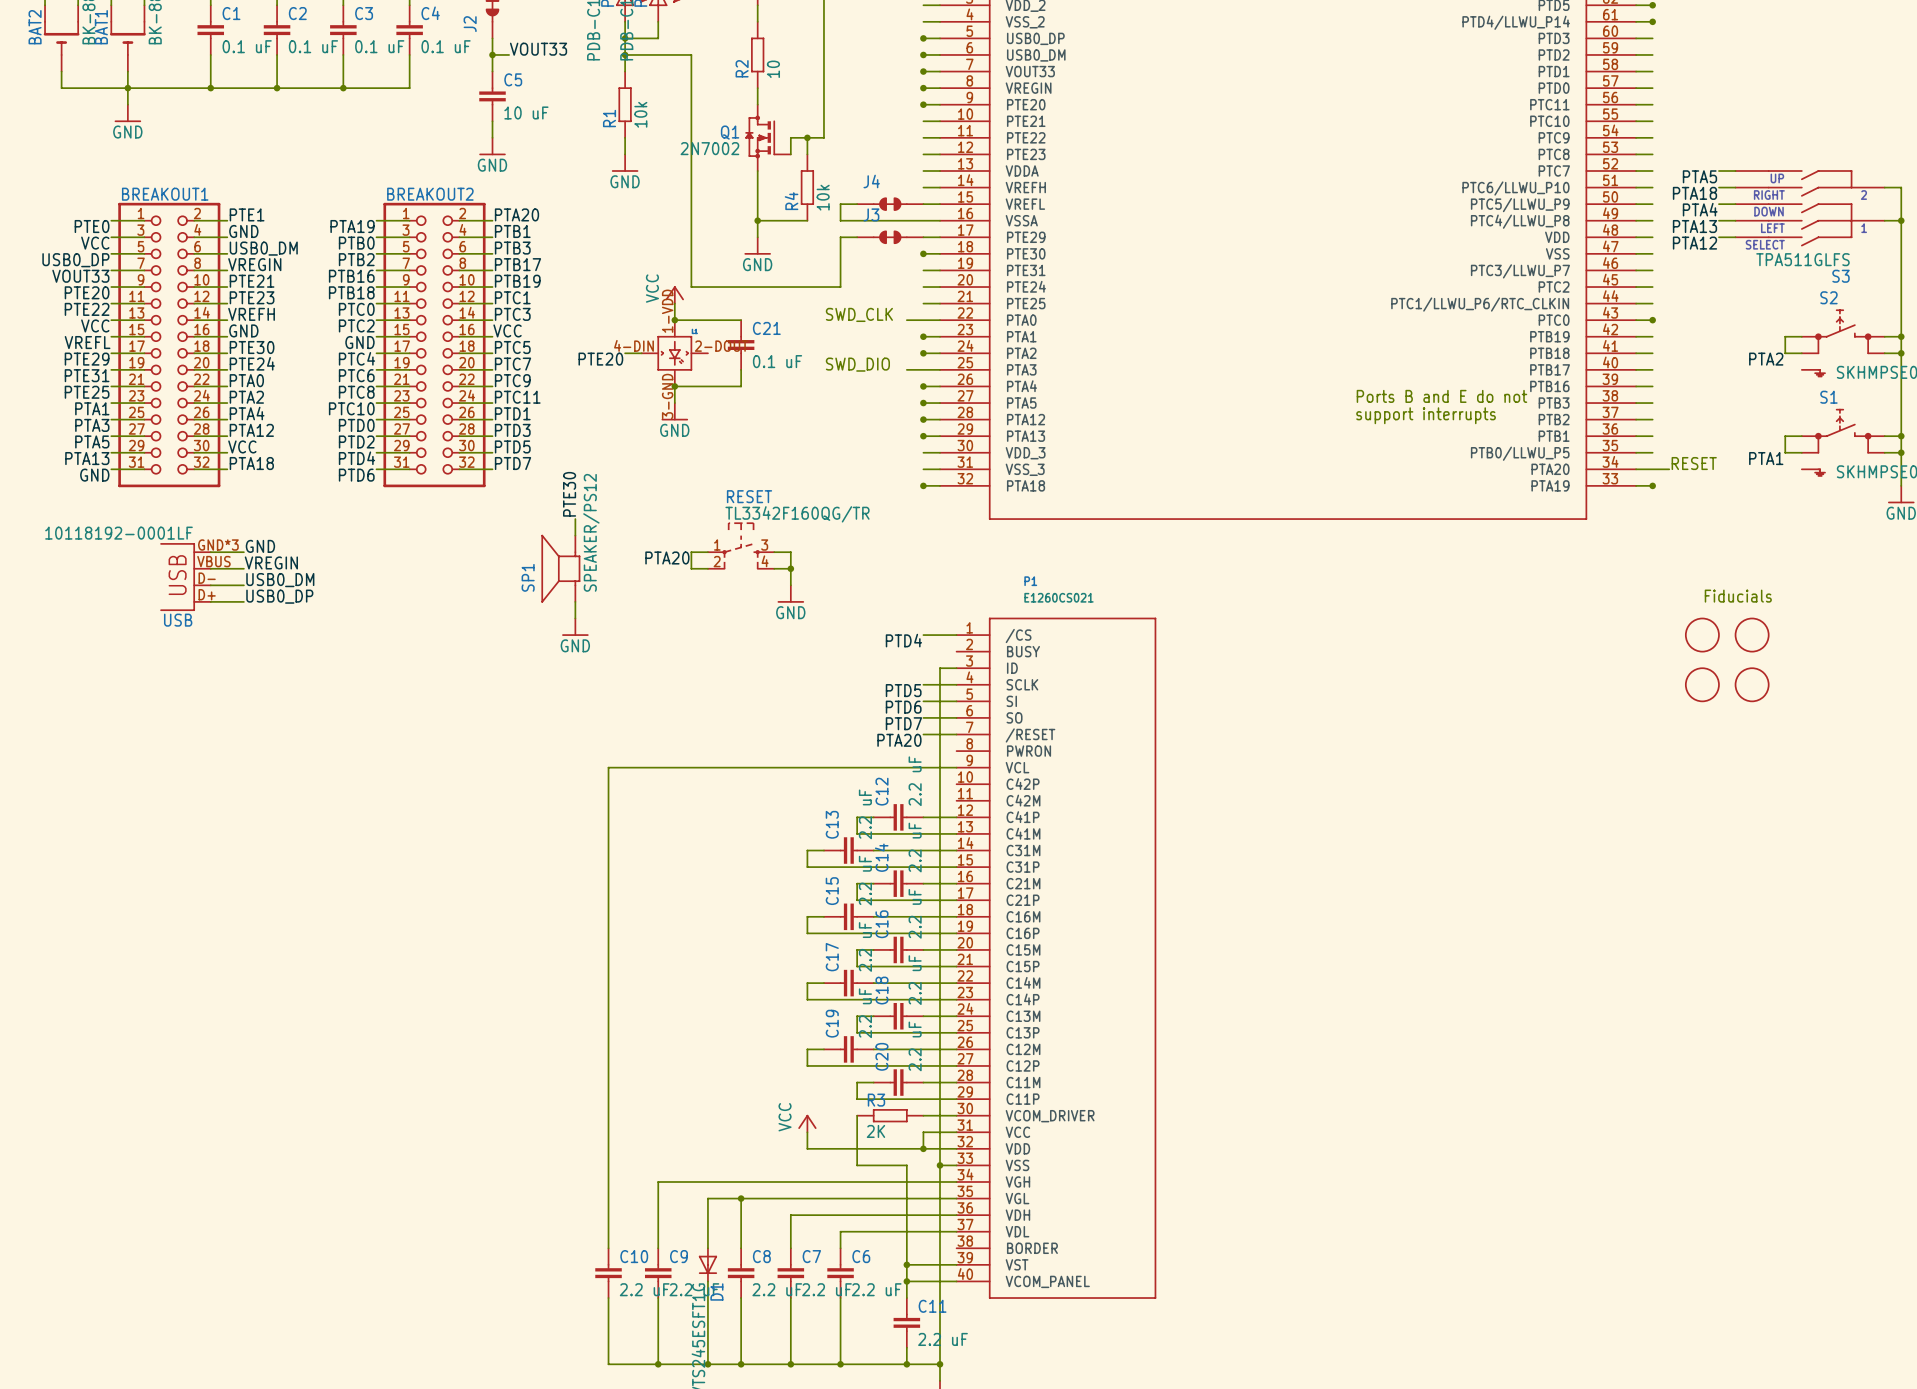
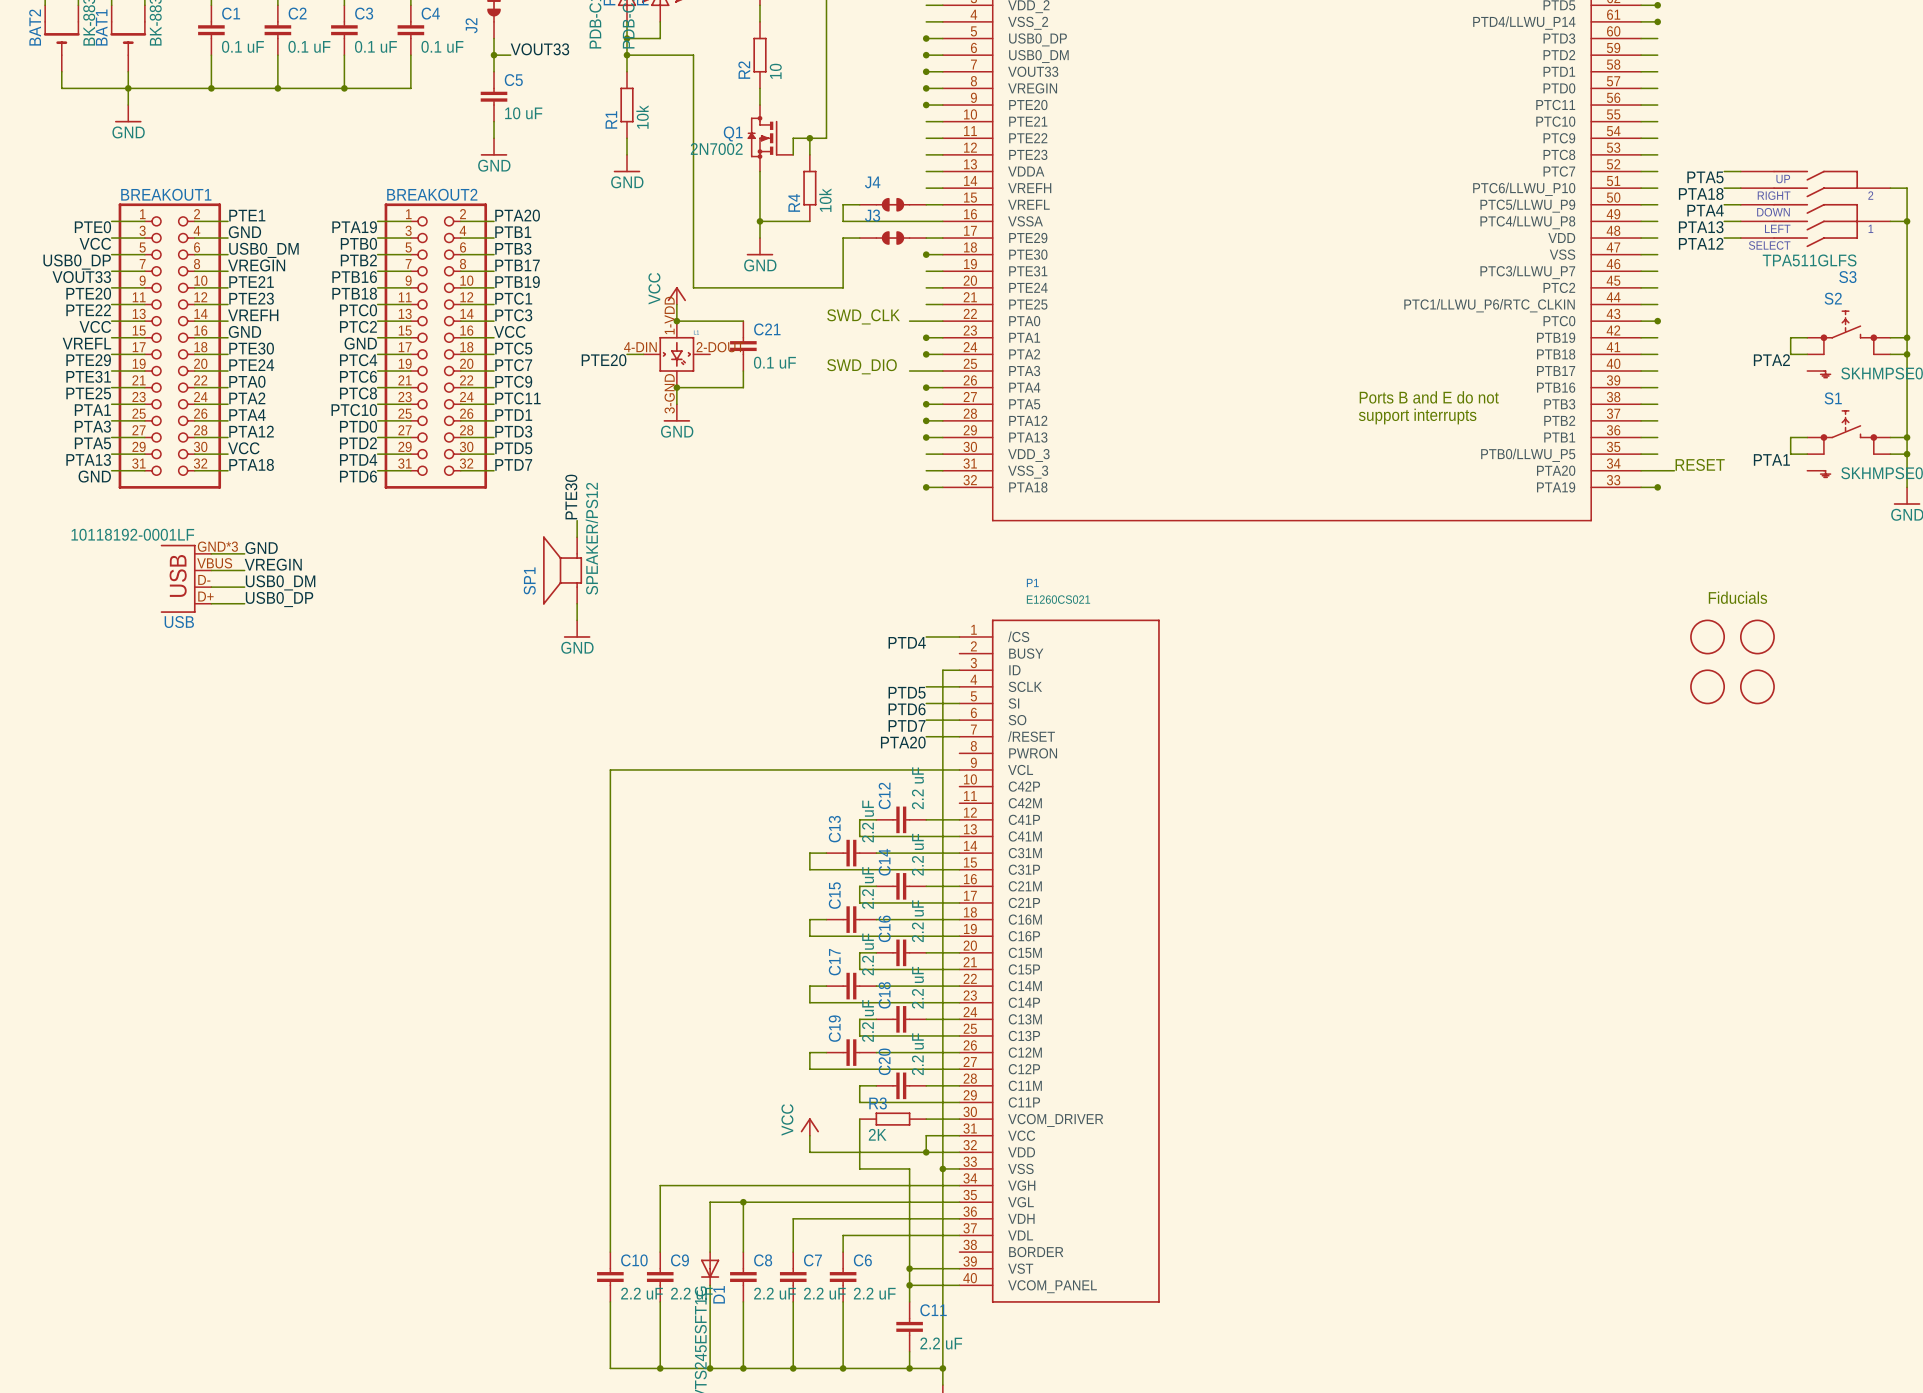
RESET: TL3342F160QG/TR (741, 545) -> none
wire: (707, 552) (691, 552) (691, 568) (707, 568) -> none
wire: (774, 552) (790, 552) (790, 585) -> none
label: PTA20 (667, 557) -> none
wire: (774, 568) (790, 568) -> none
junction: (790, 568) -> none
power symbol: GND (790, 594) -> none

